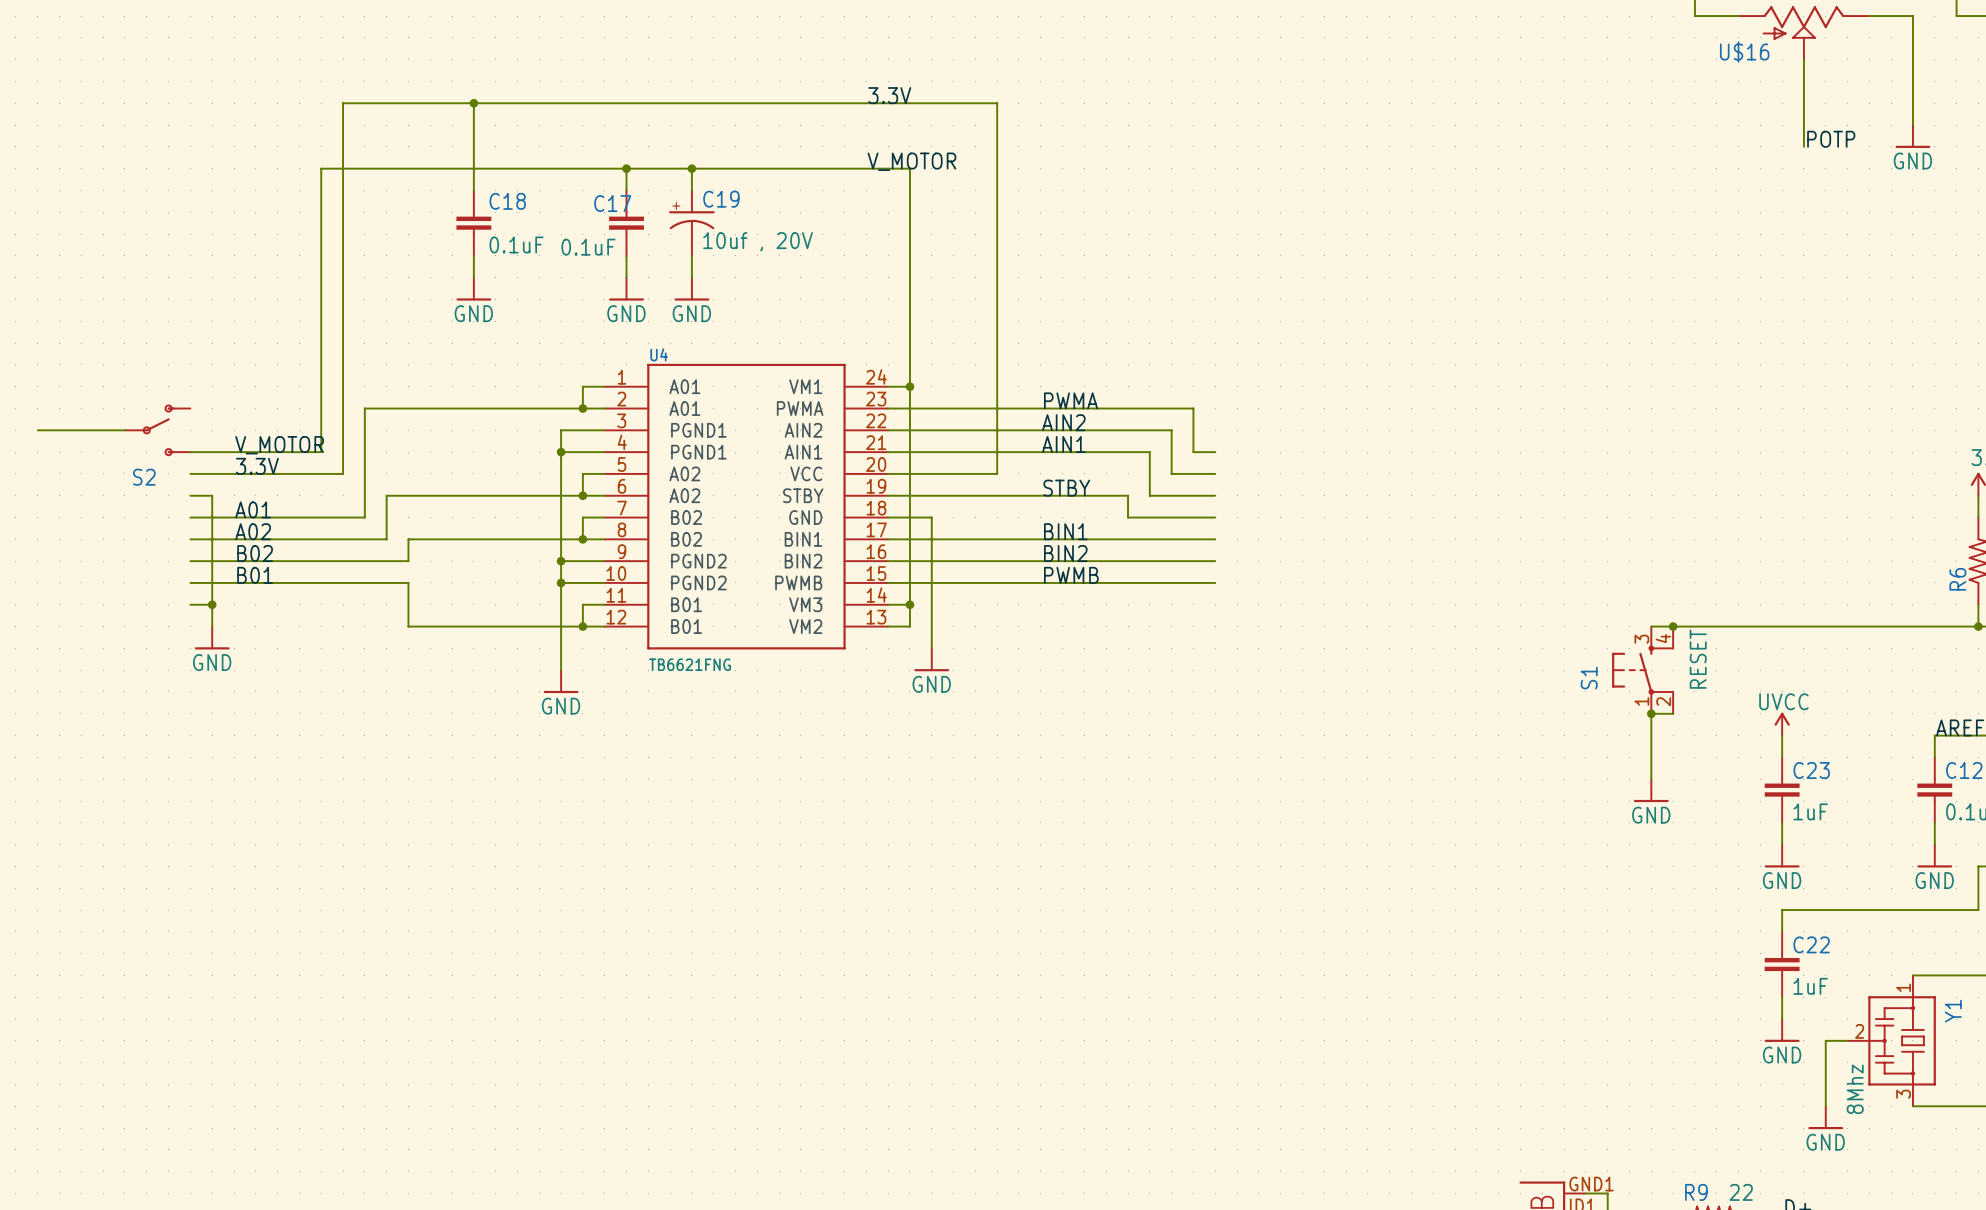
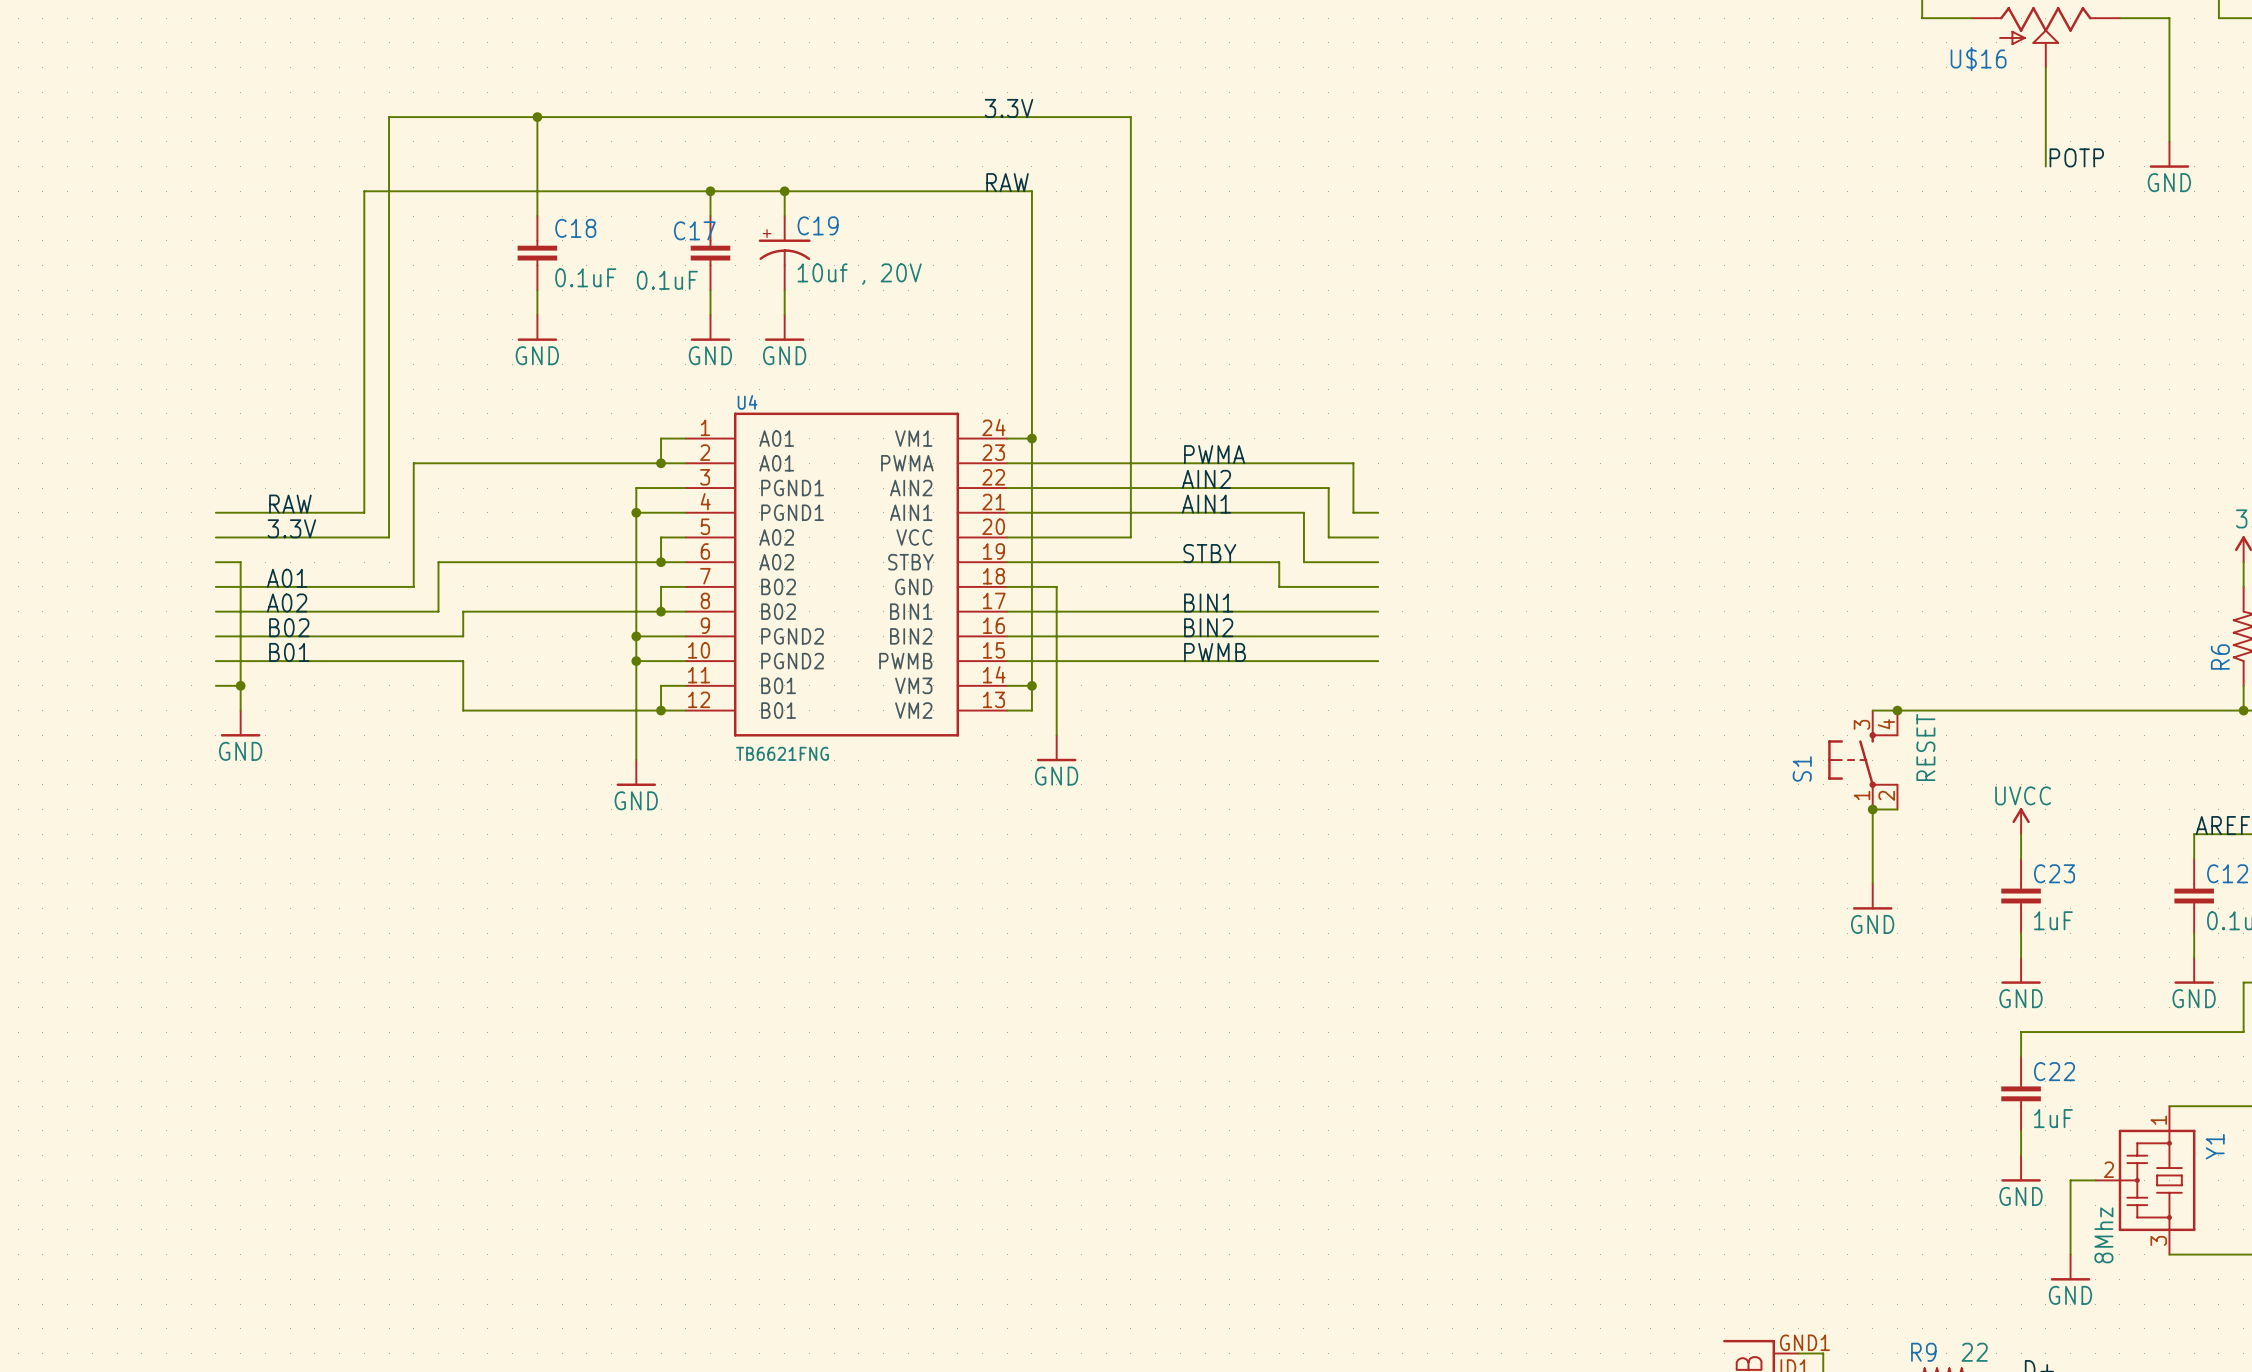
label: V_MOTOR (911, 161) -> RAW (1007, 182)
wire: (37, 430) (124, 430) -> none
S2: (157, 430) -> none
label: V_MOTOR (279, 445) -> RAW (290, 504)

